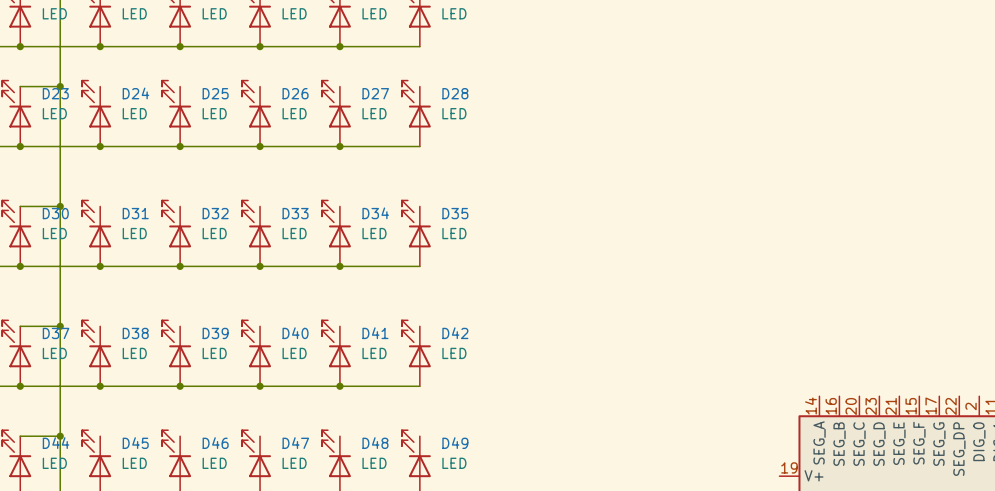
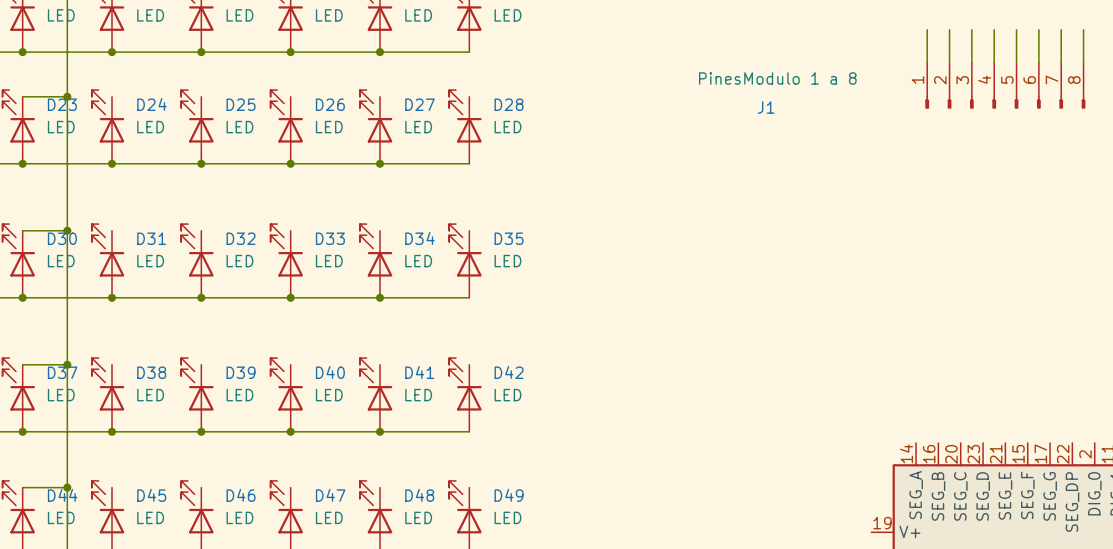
wire: none -> (927, 29) (927, 63)
wire: none -> (949, 29) (949, 63)
wire: none -> (971, 29) (971, 63)
wire: none -> (994, 29) (994, 63)
wire: none -> (1016, 29) (1016, 63)
wire: none -> (1038, 29) (1038, 63)
wire: none -> (1061, 29) (1061, 63)
wire: none -> (1083, 29) (1083, 63)
J1: none -> PinesModulo 1 a 8 (1005, 85)

